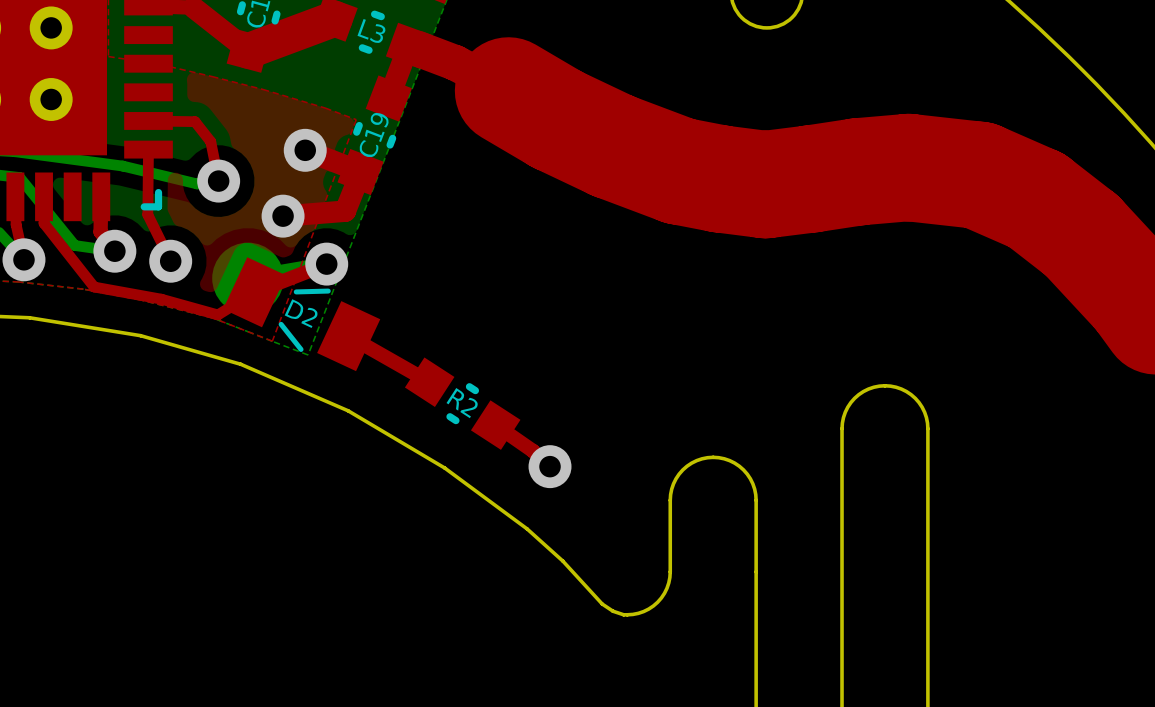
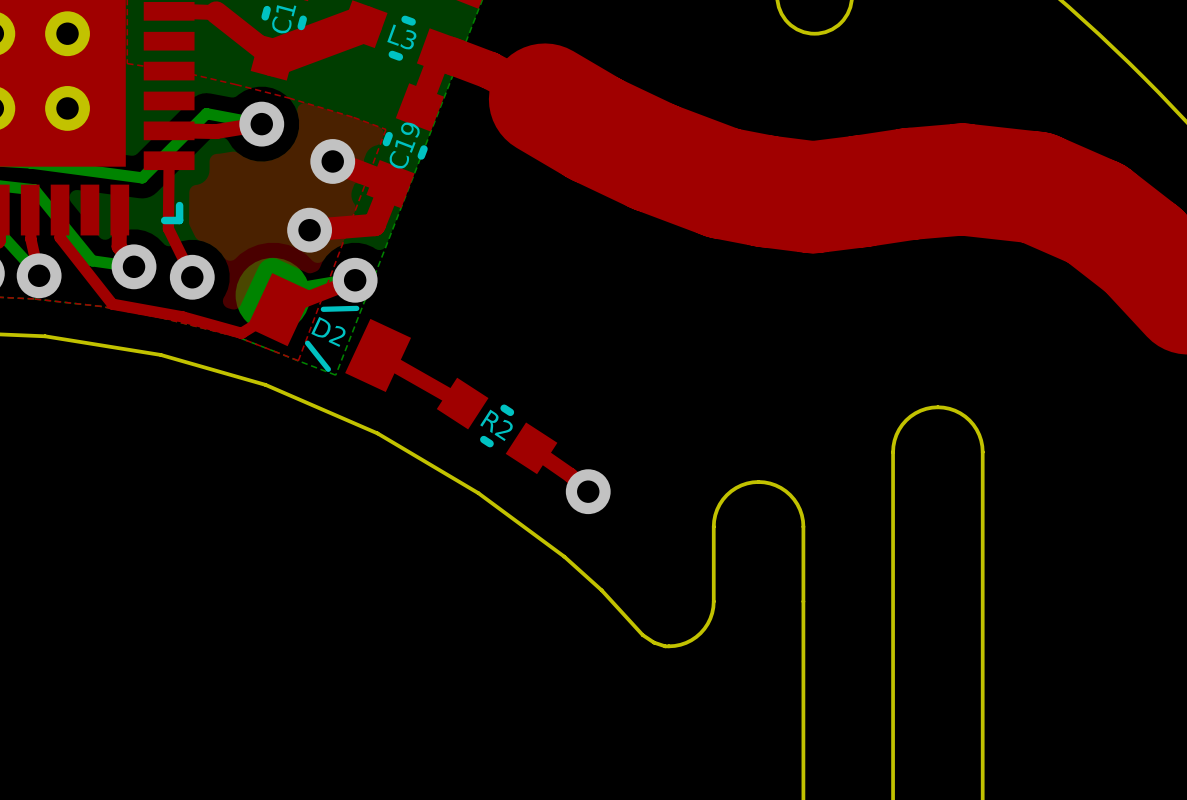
top track: none -> (261, 124) (216, 131) (179, 130)
top track: (148, 120) (195, 121) (210, 141) (218, 181) -> none
bottom track: (122, 166) (197, 183) (218, 181) -> (142, 177) (206, 113) (261, 124)
via position: (218, 181) -> (261, 124)

